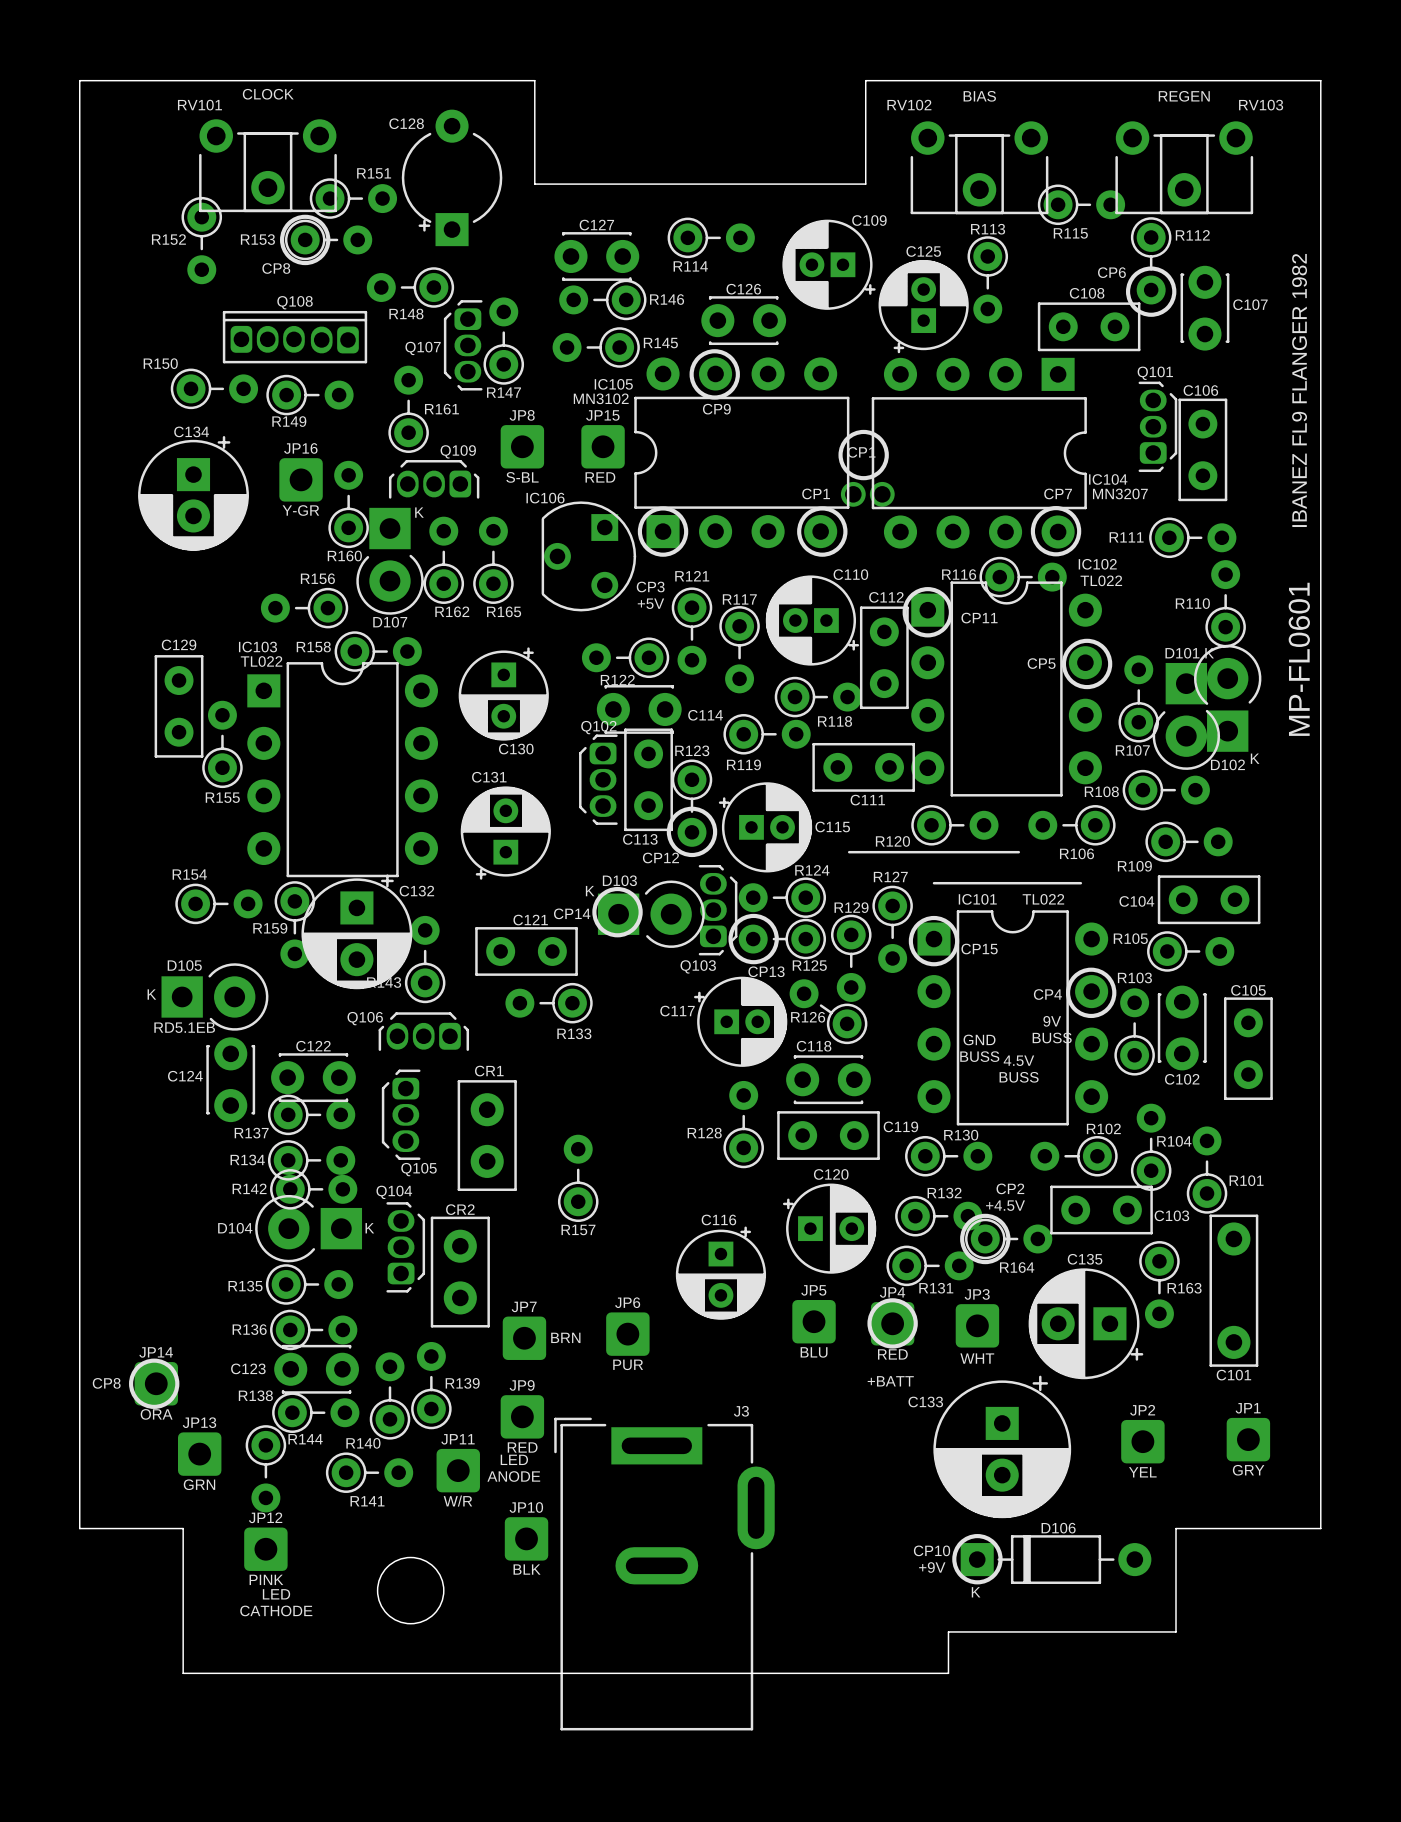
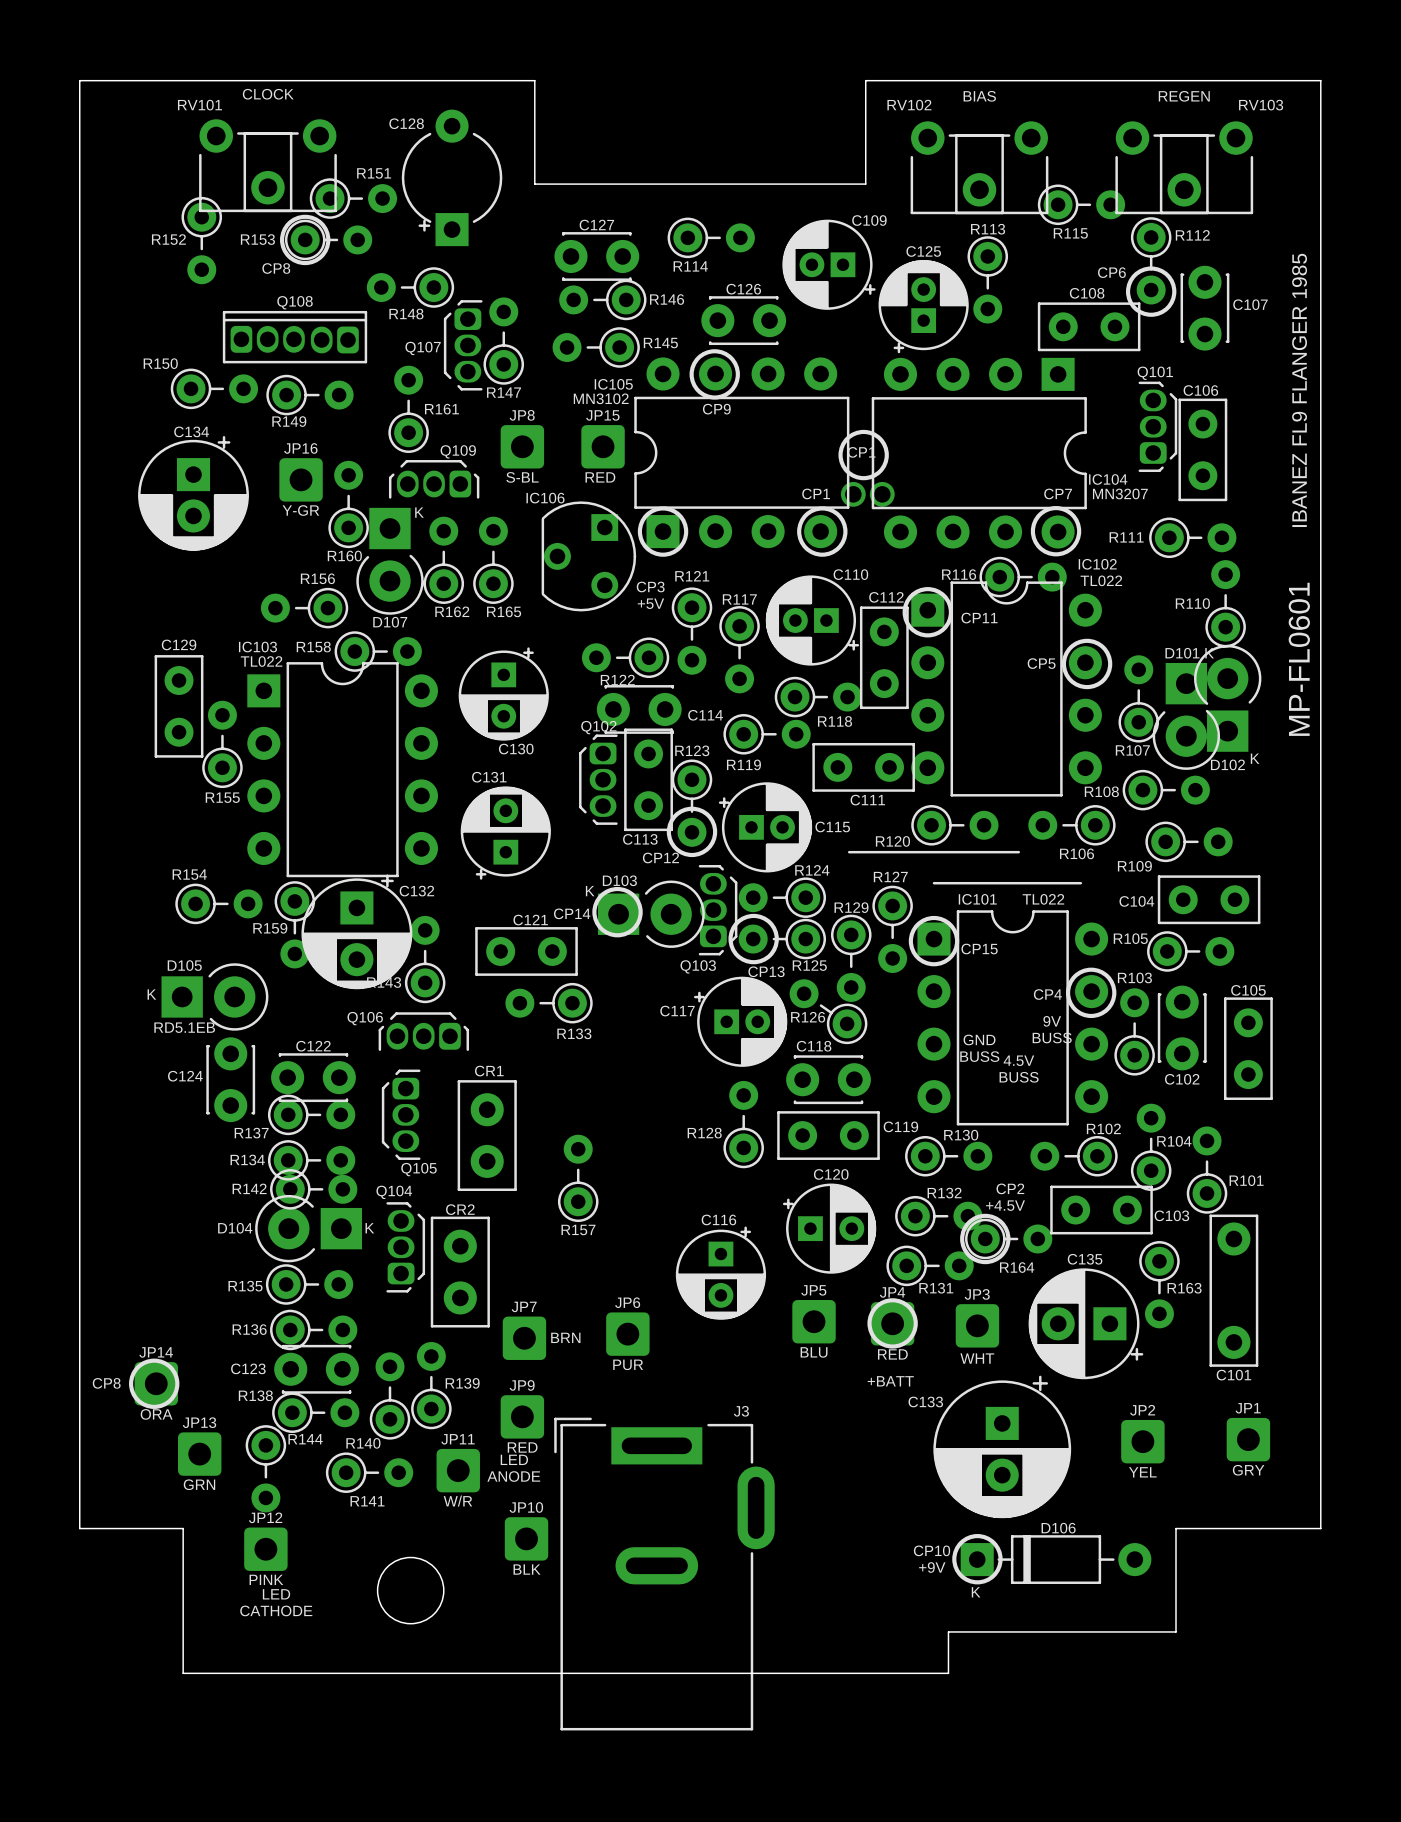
text: IBANEZ FL9 FLANGER 1982 (1299, 390) -> IBANEZ FL9 FLANGER 1985 (1299, 390)

